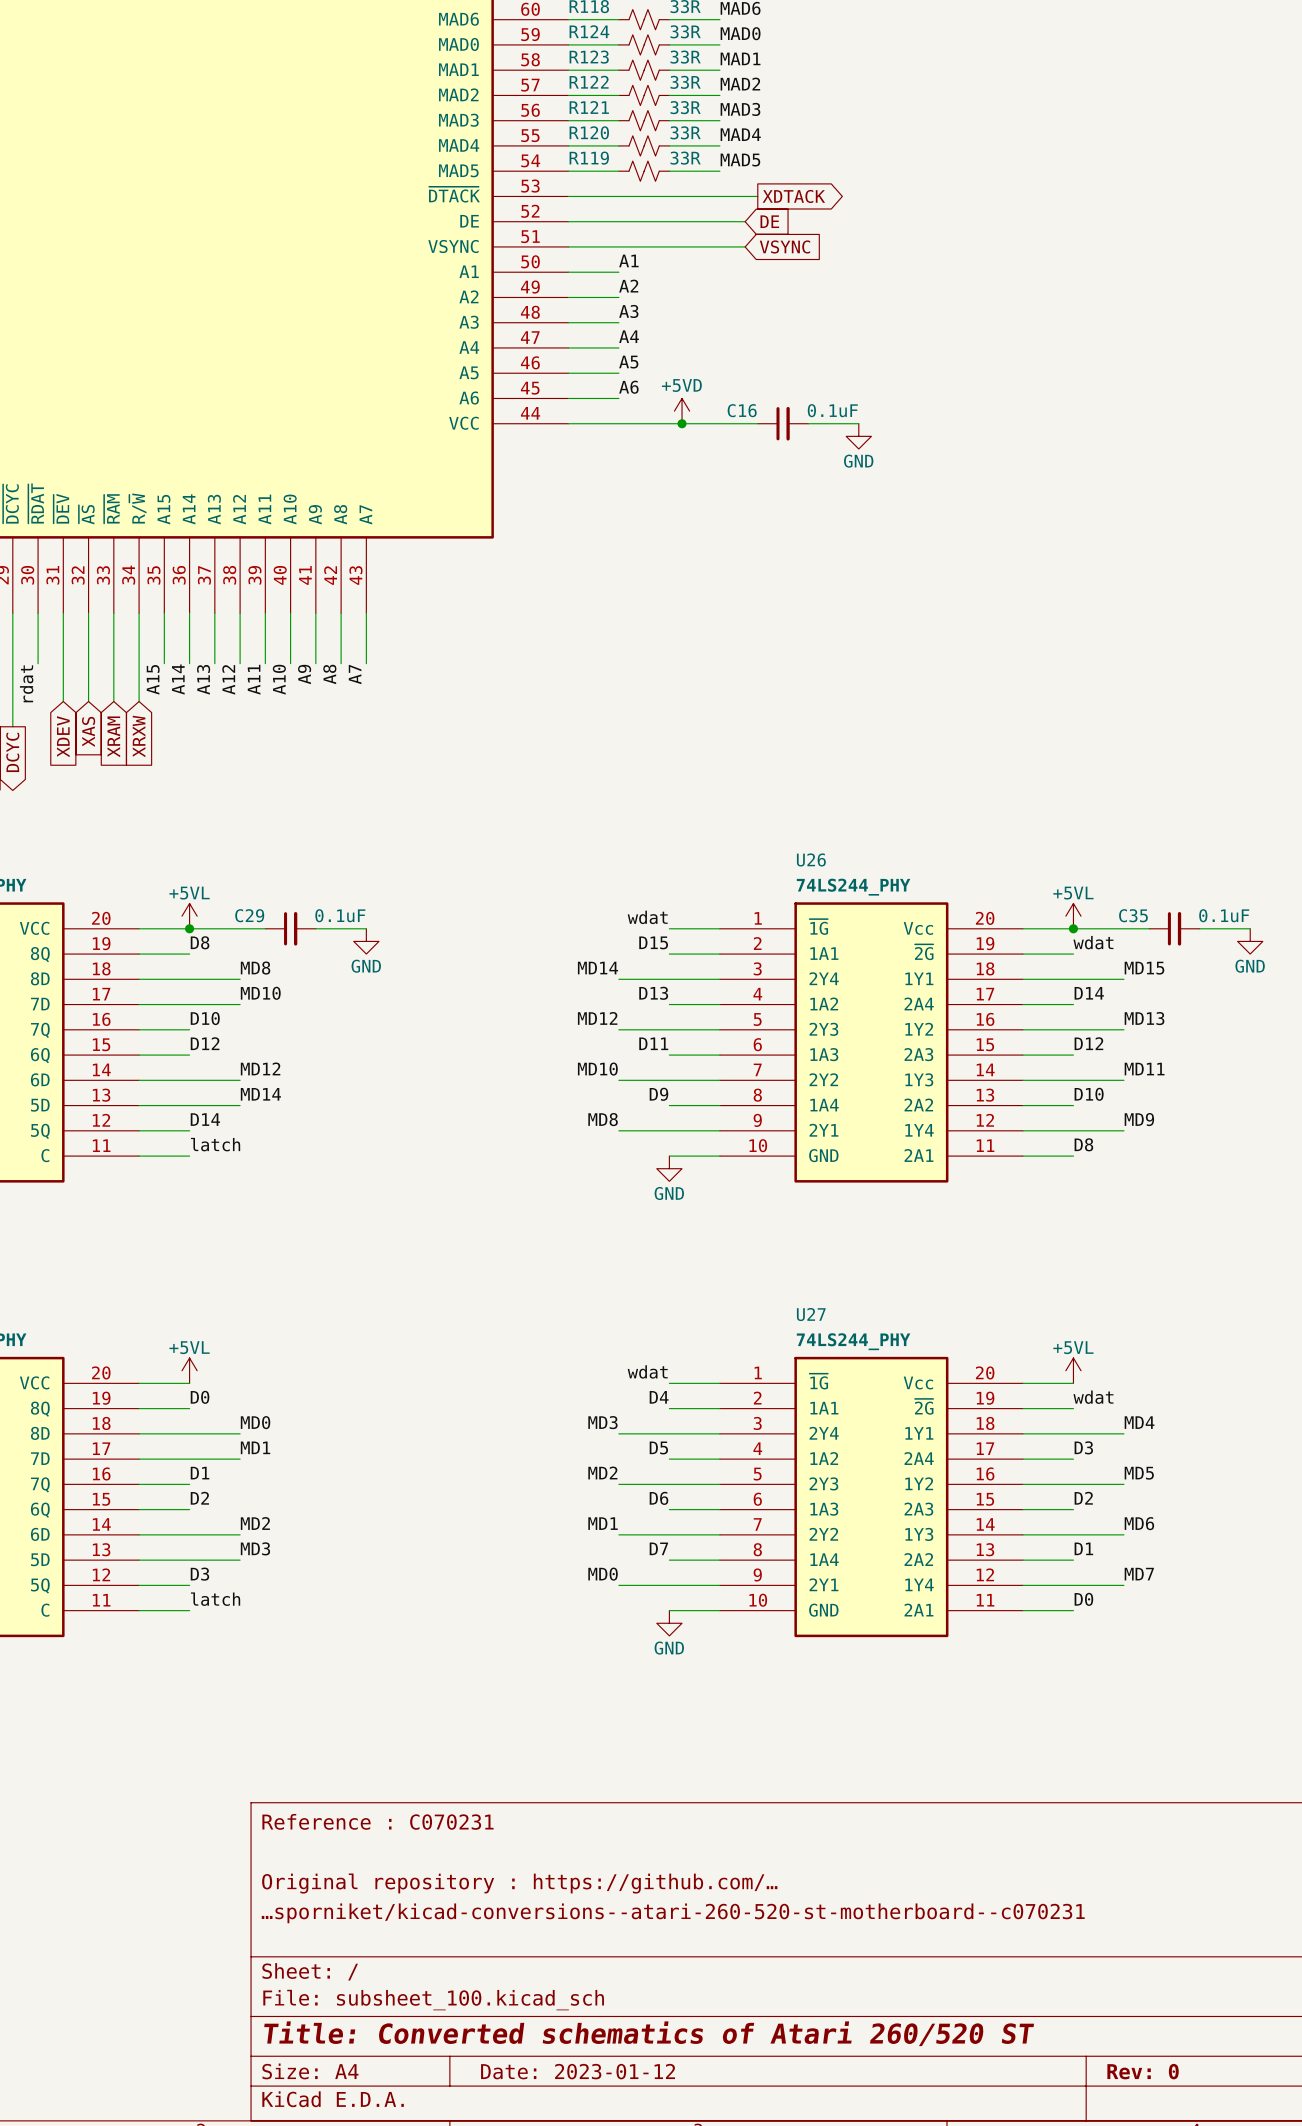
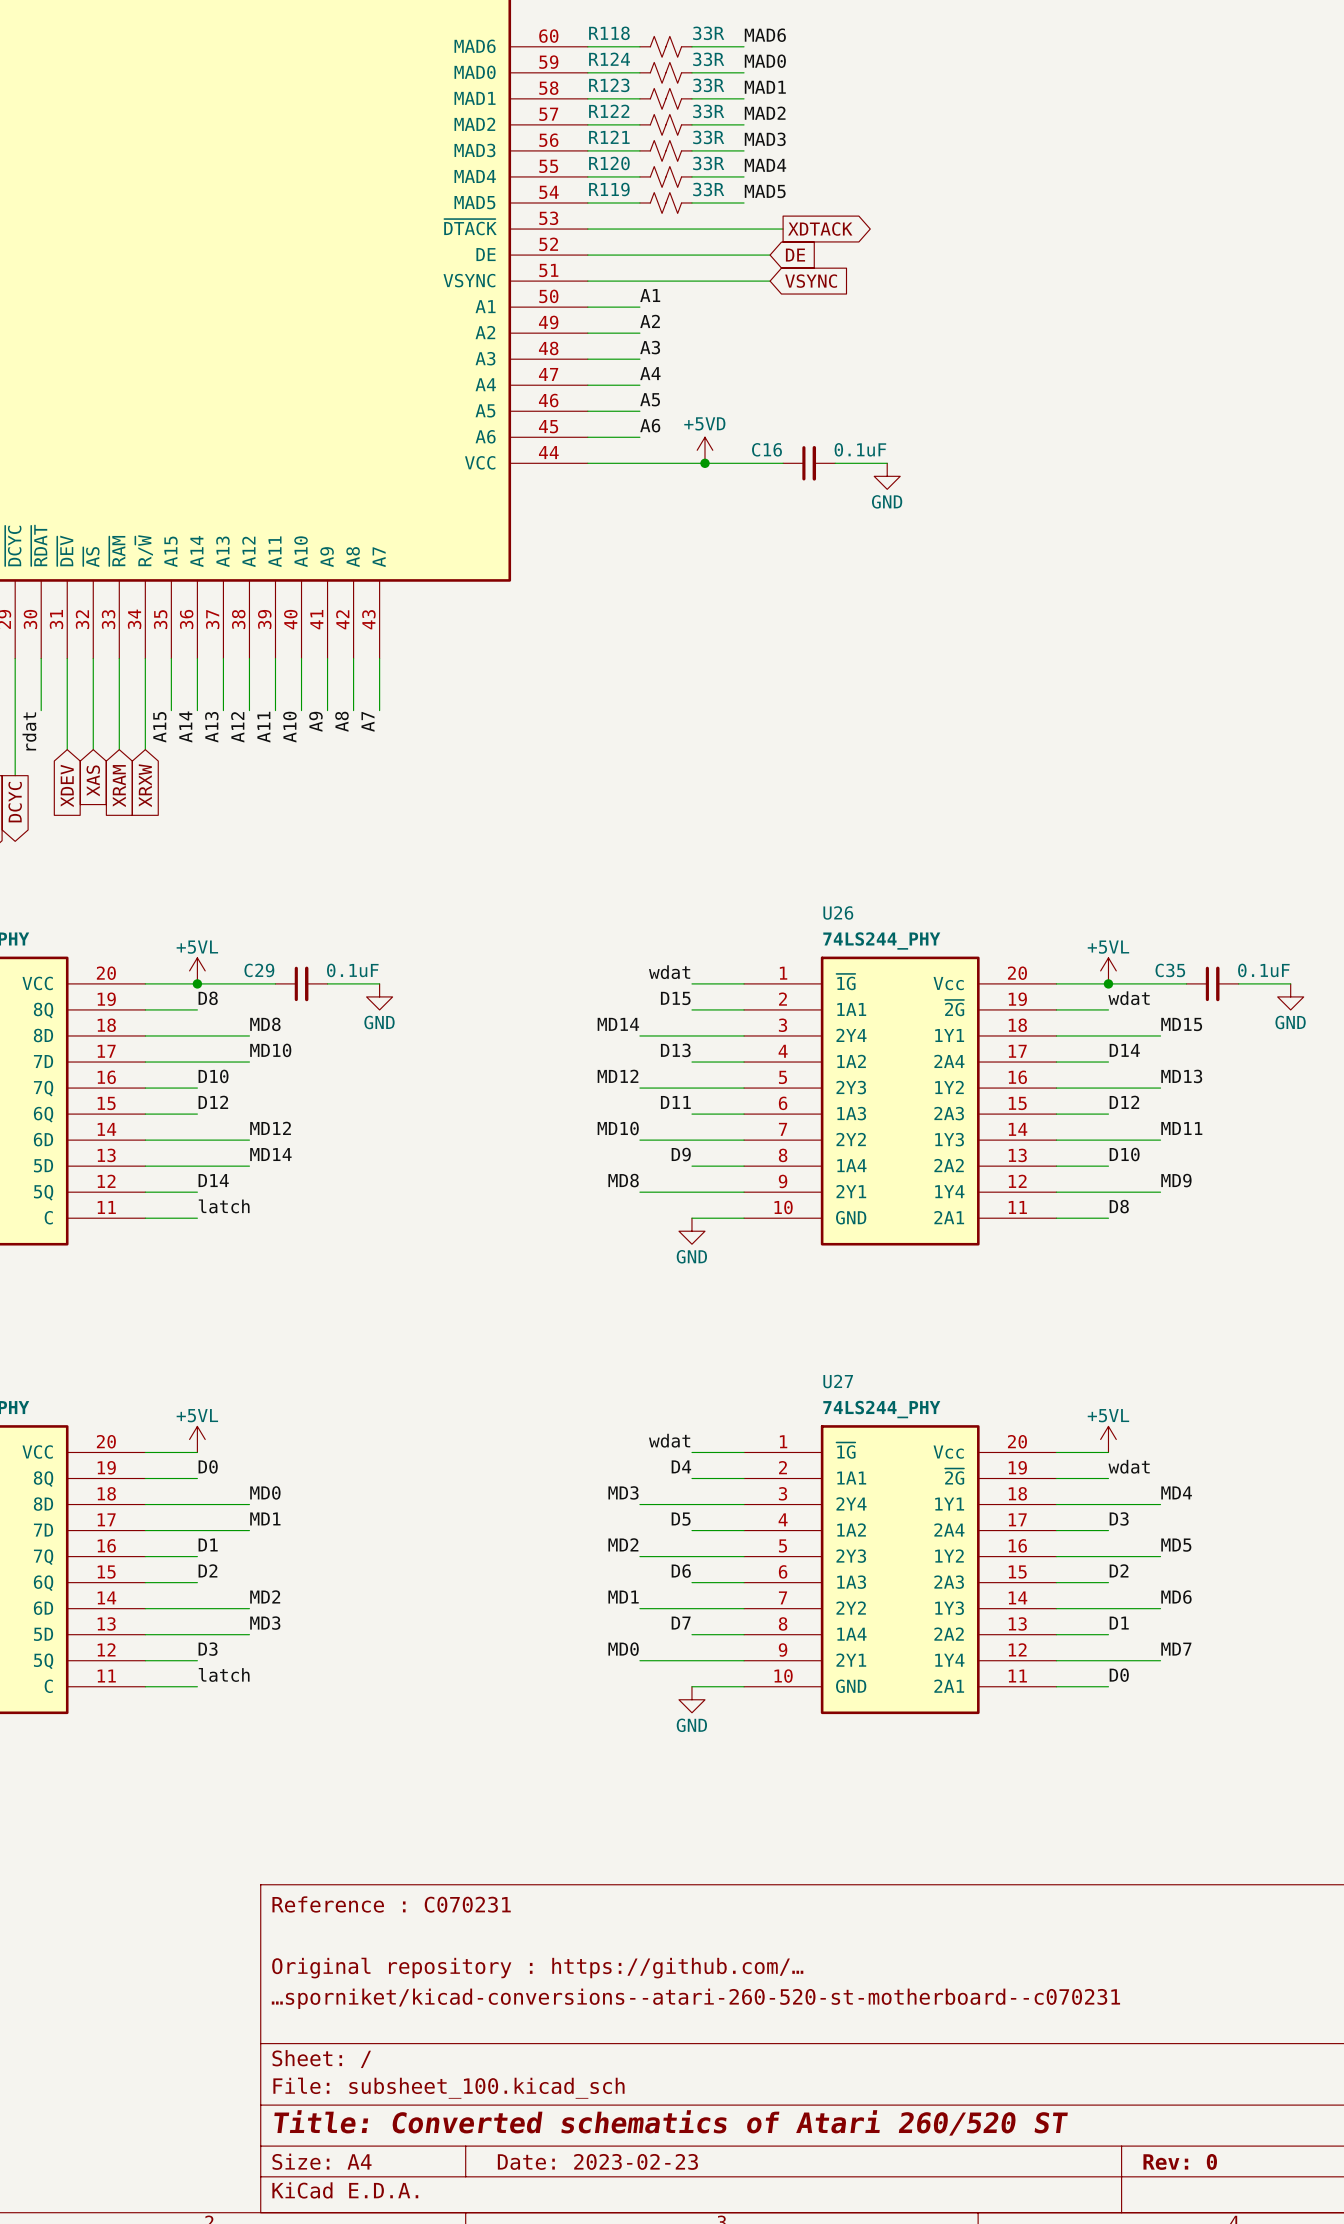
title block: Date: 2023-01-12 (578, 2071) -> Date: 2023-02-23 (597, 2161)

